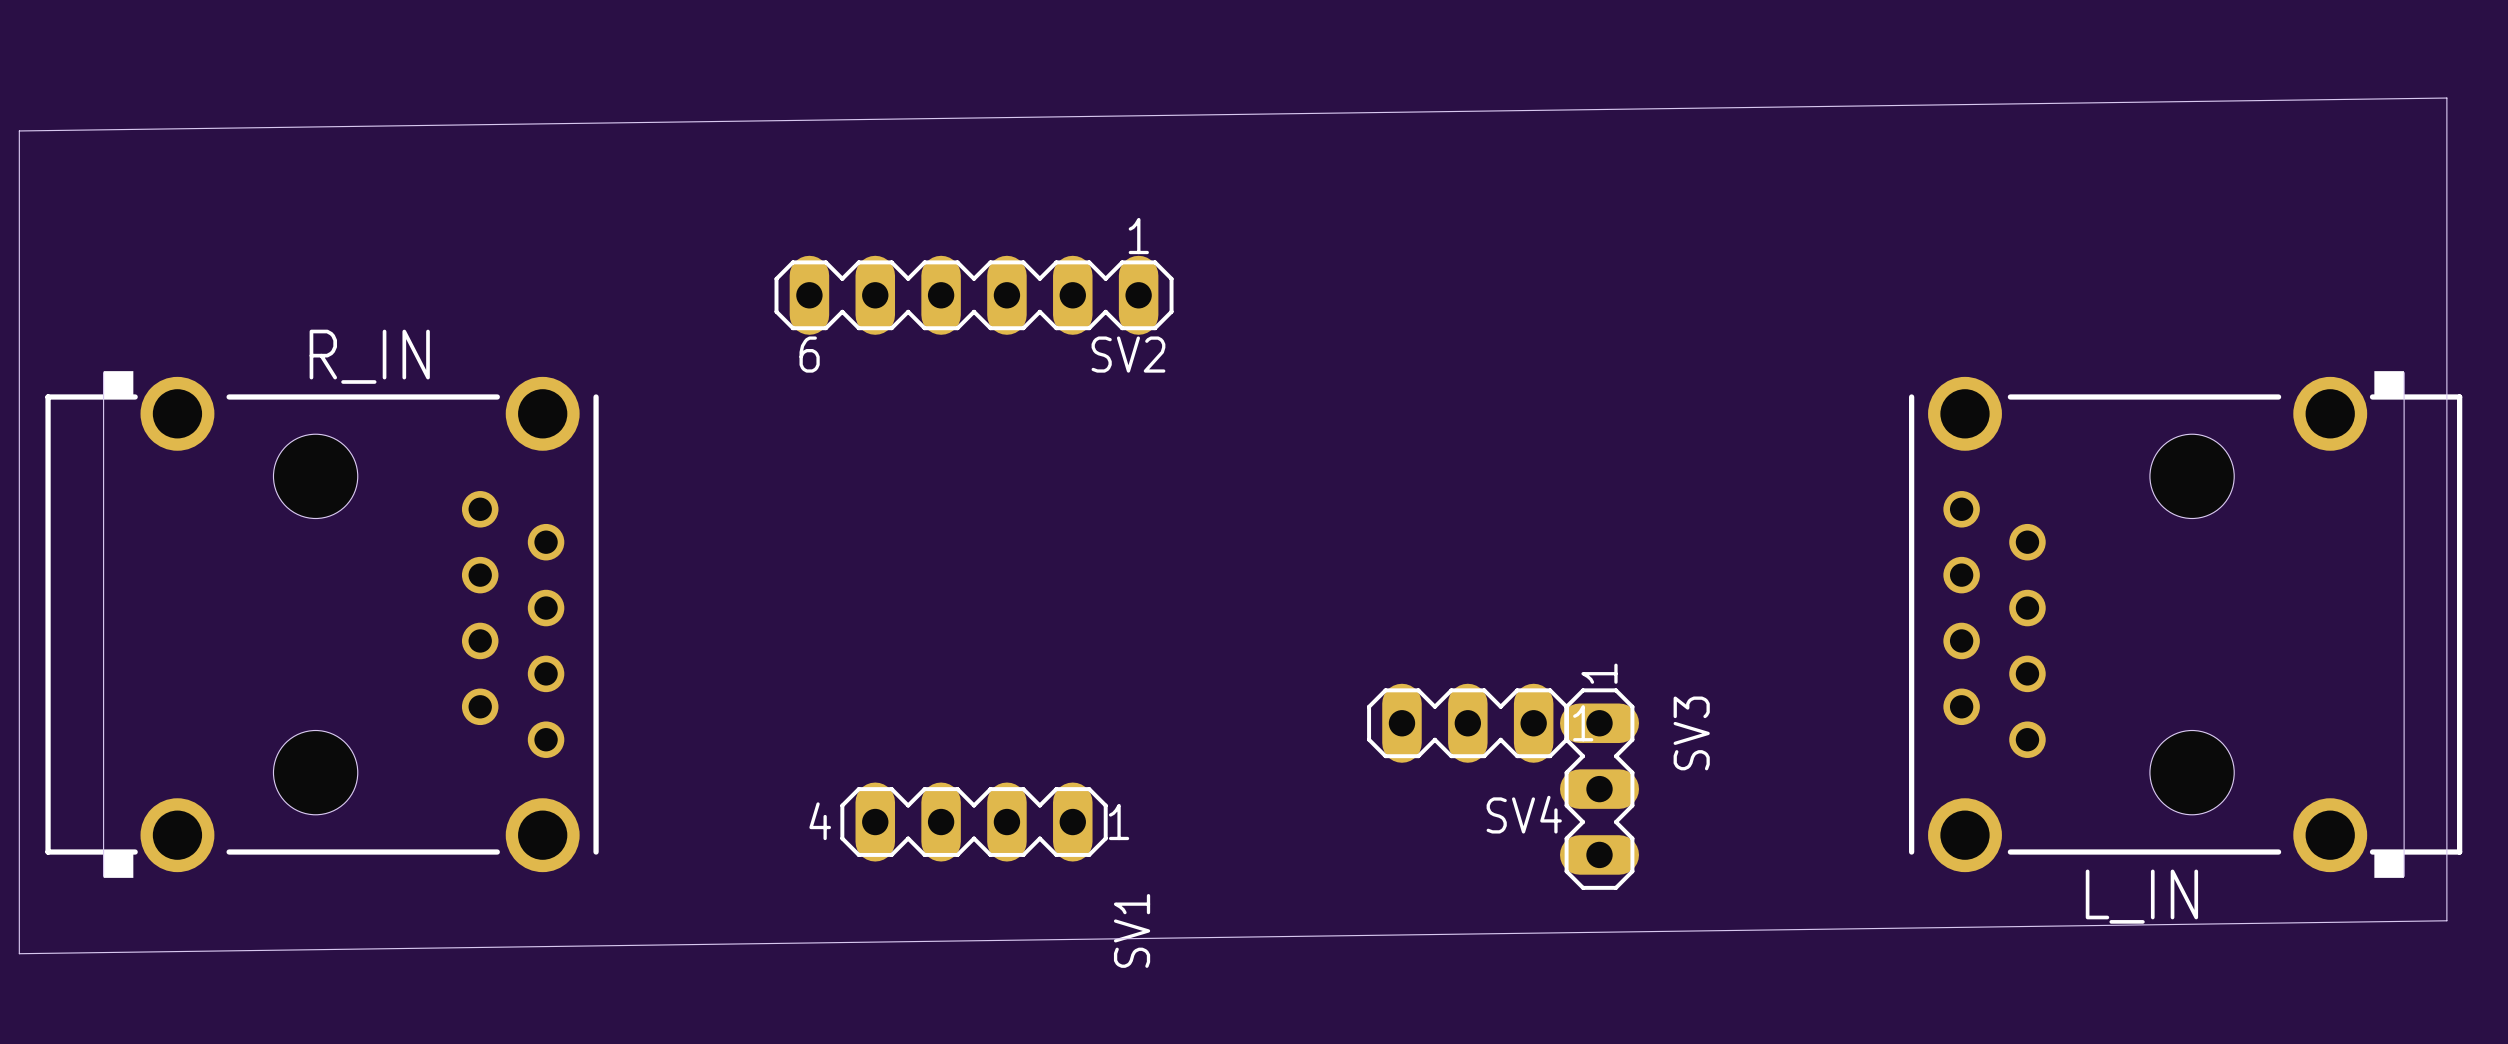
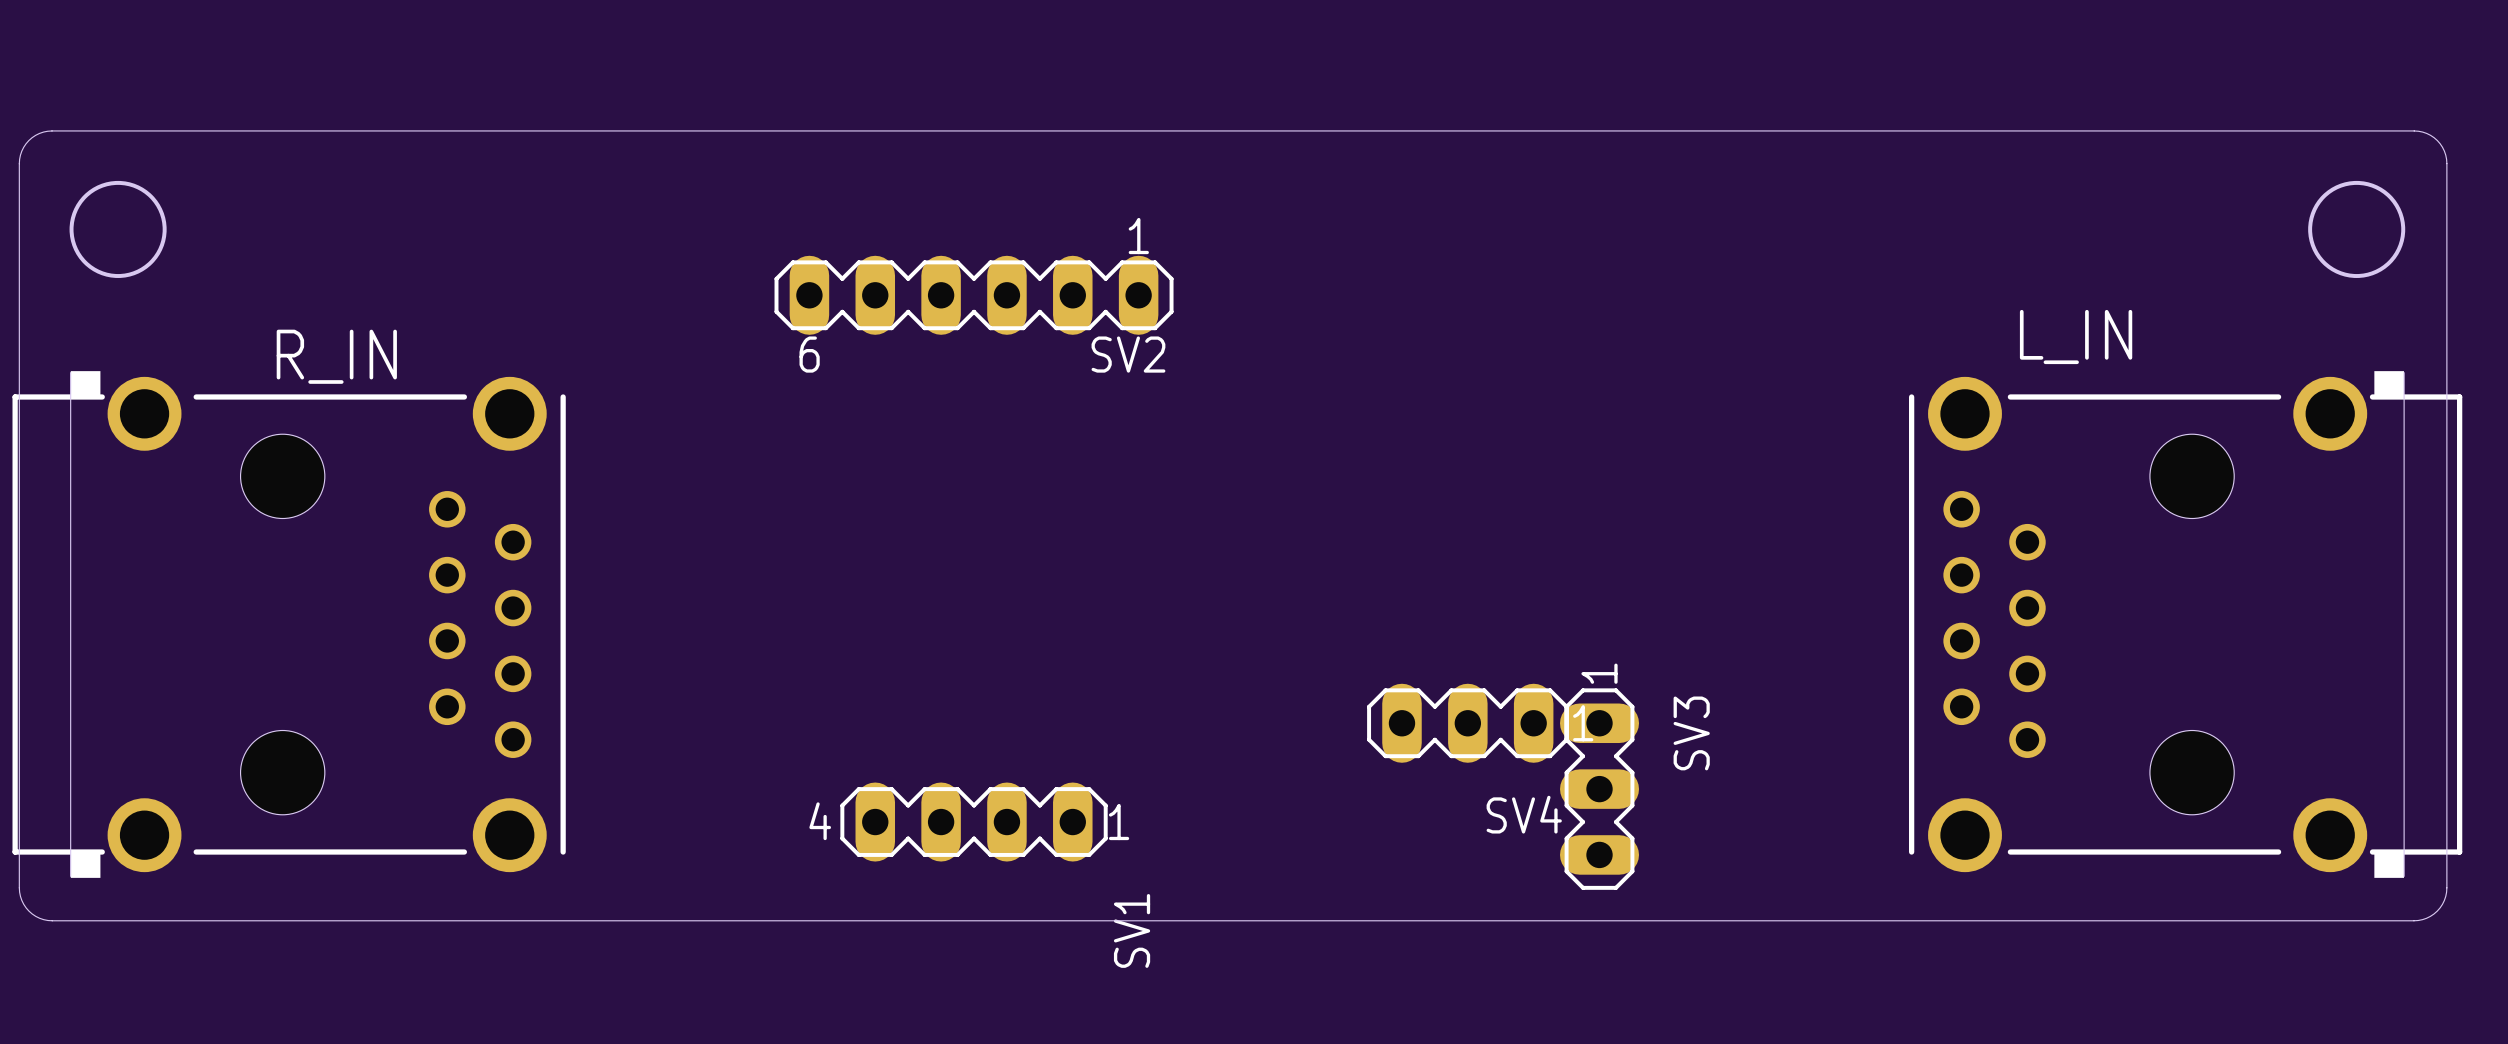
board edge: (19, 163) (19, 130) (2446, 98) (2446, 163) -> (19, 163) (21, 151) (28, 140) (39, 133) (51, 130) (2414, 130) (2426, 133) (2437, 140) (2444, 151) (2446, 163)
round board edge: none -> [69, 180, 167, 278]
round board edge: none -> [2308, 180, 2406, 278]
R_IN position: (322, 624) -> (289, 624)
board edge: (19, 887) (19, 953) (2446, 920) (2446, 887) -> (19, 887) (21, 900) (28, 911) (39, 918) (52, 920) (2413, 920) (2426, 918) (2437, 911) (2444, 900) (2446, 887)
L_IN name position: L_IN (2141, 896) -> L_IN (2076, 337)

